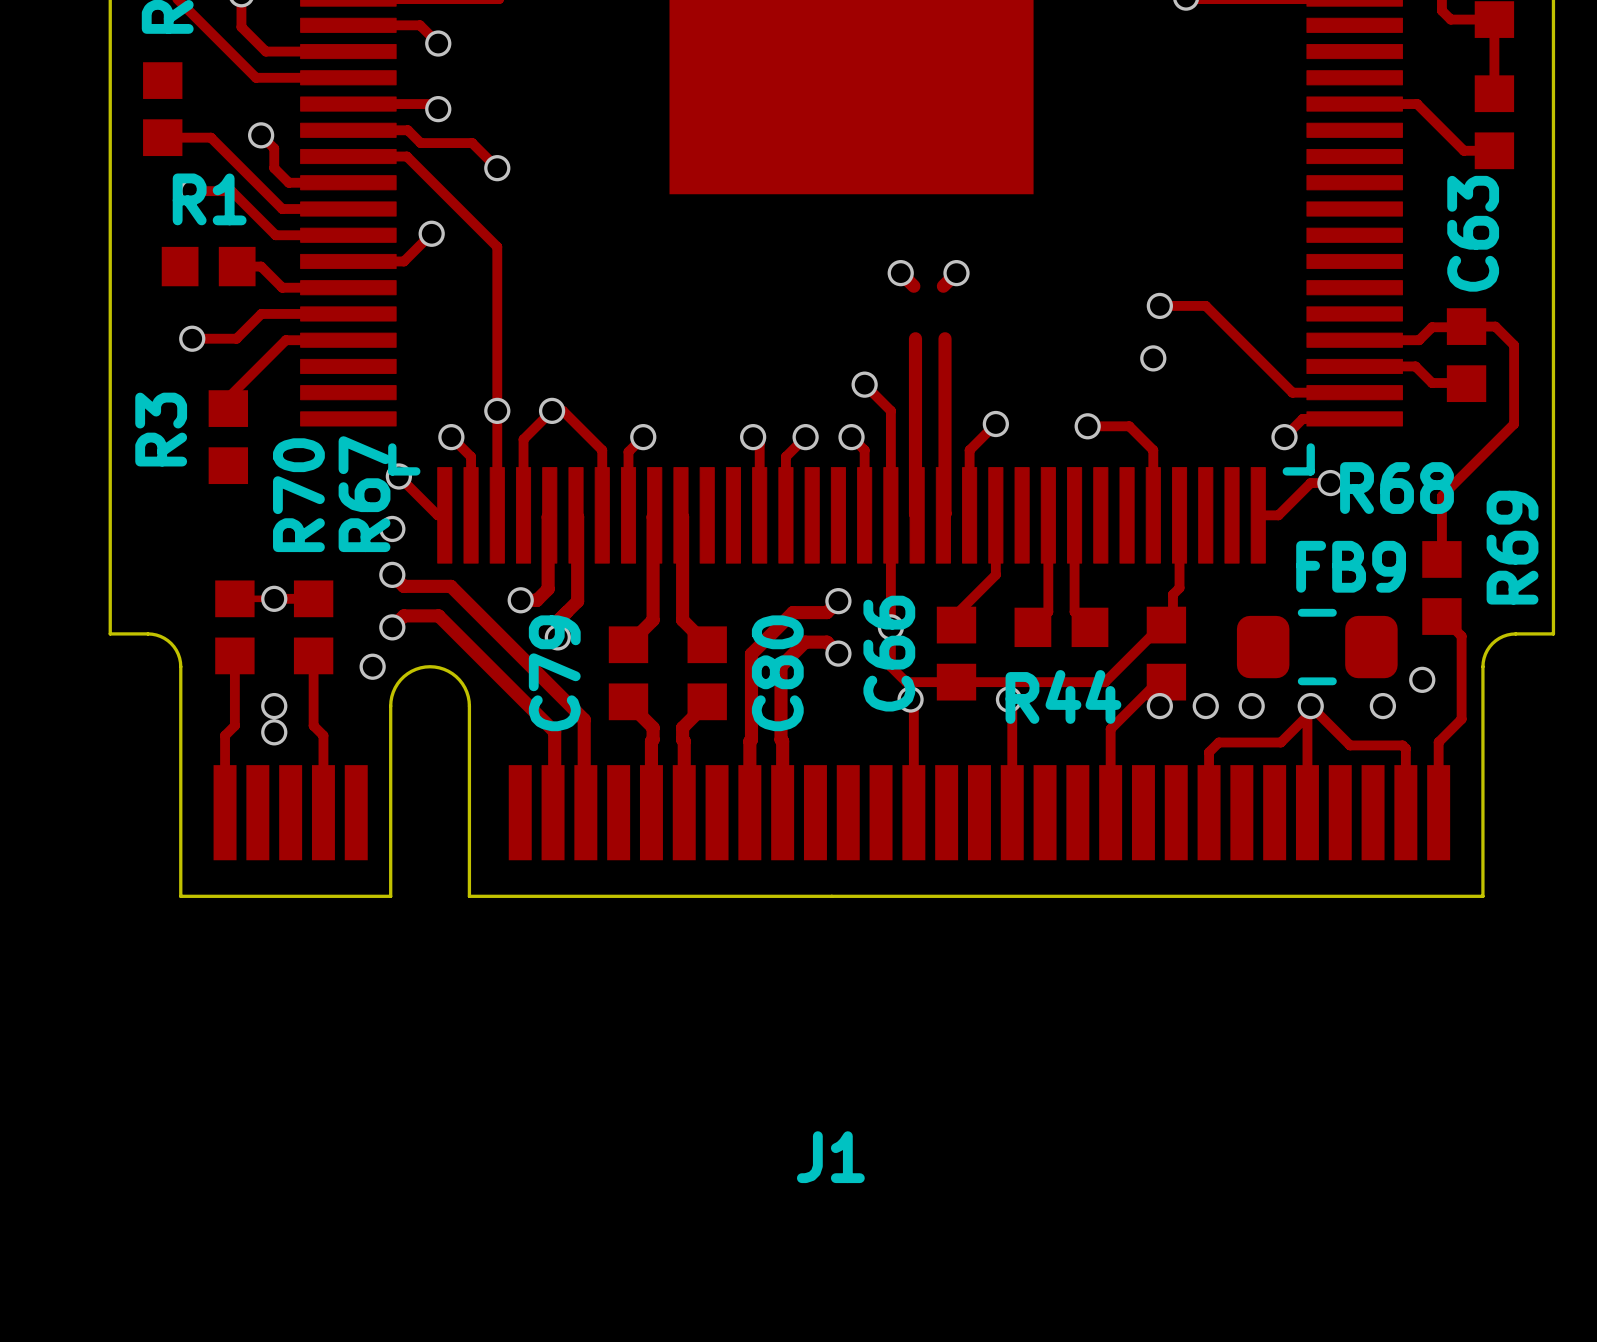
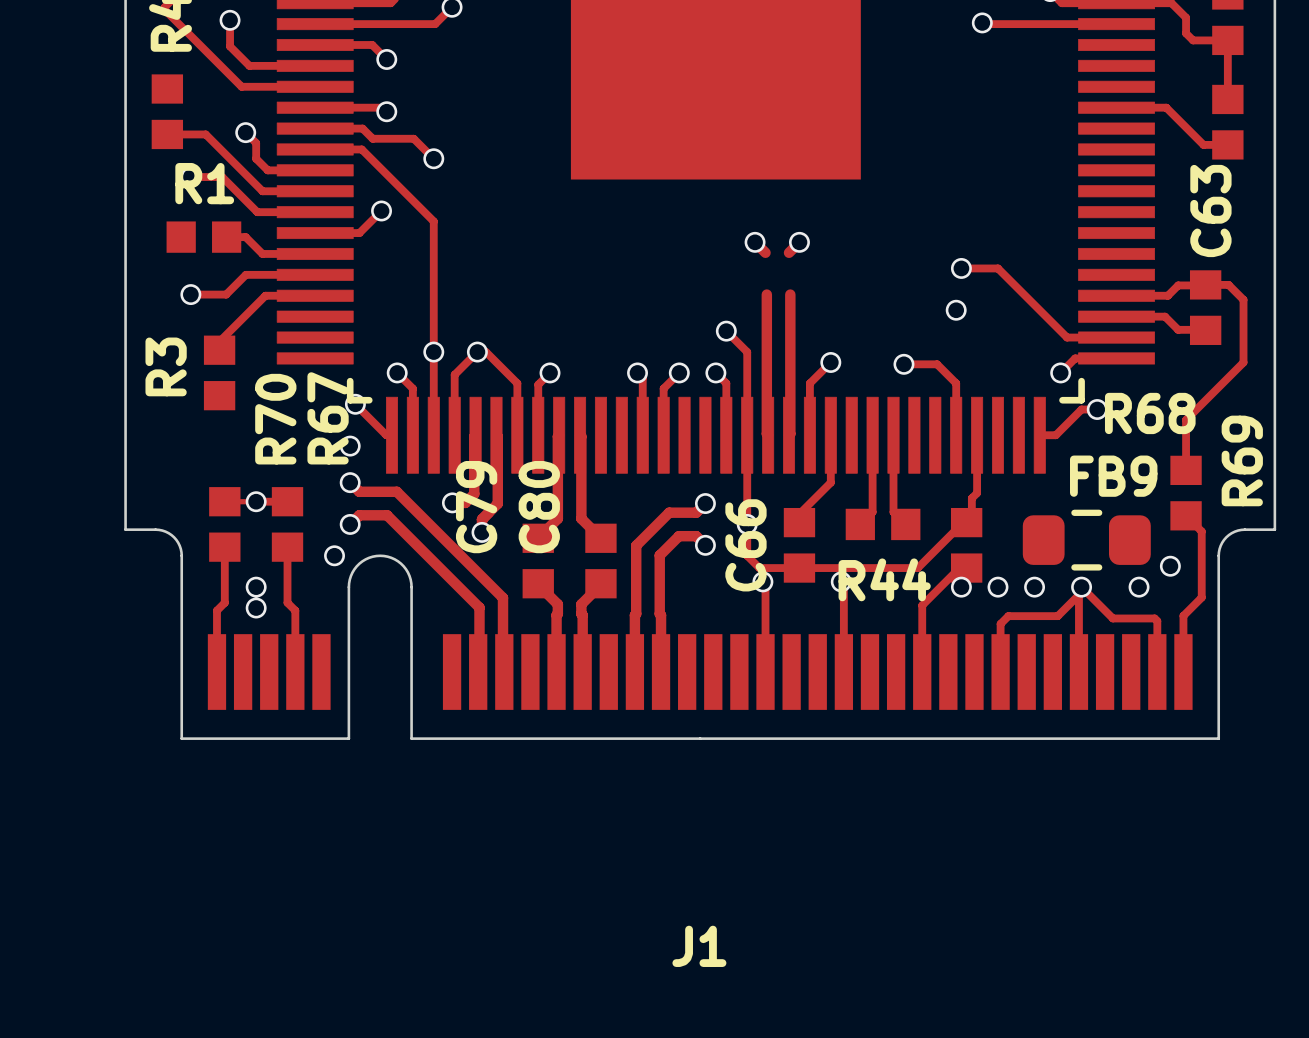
C79 name position: C79 (554, 673) -> C79 (476, 507)
C80 name position: C80 (777, 673) -> C80 (539, 507)

